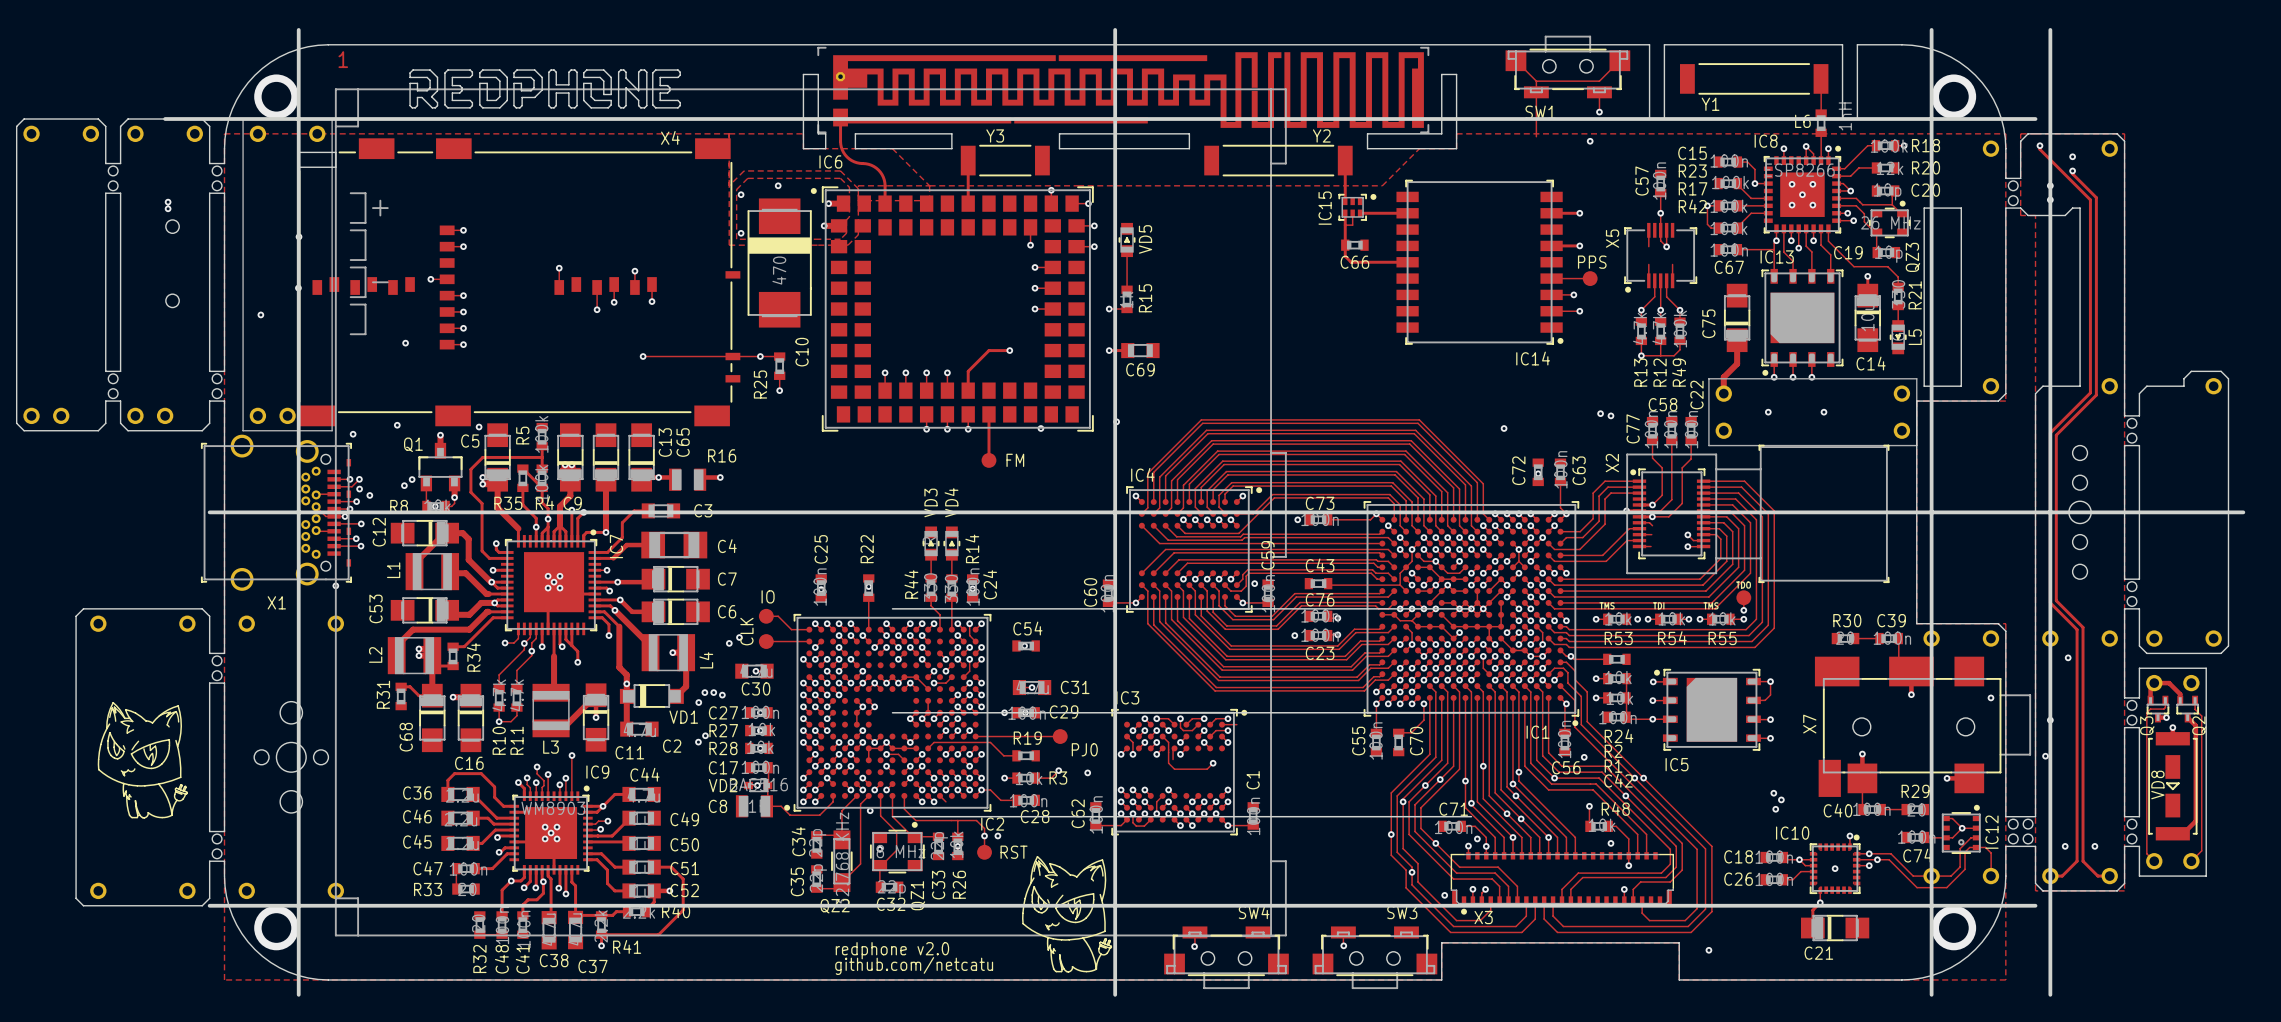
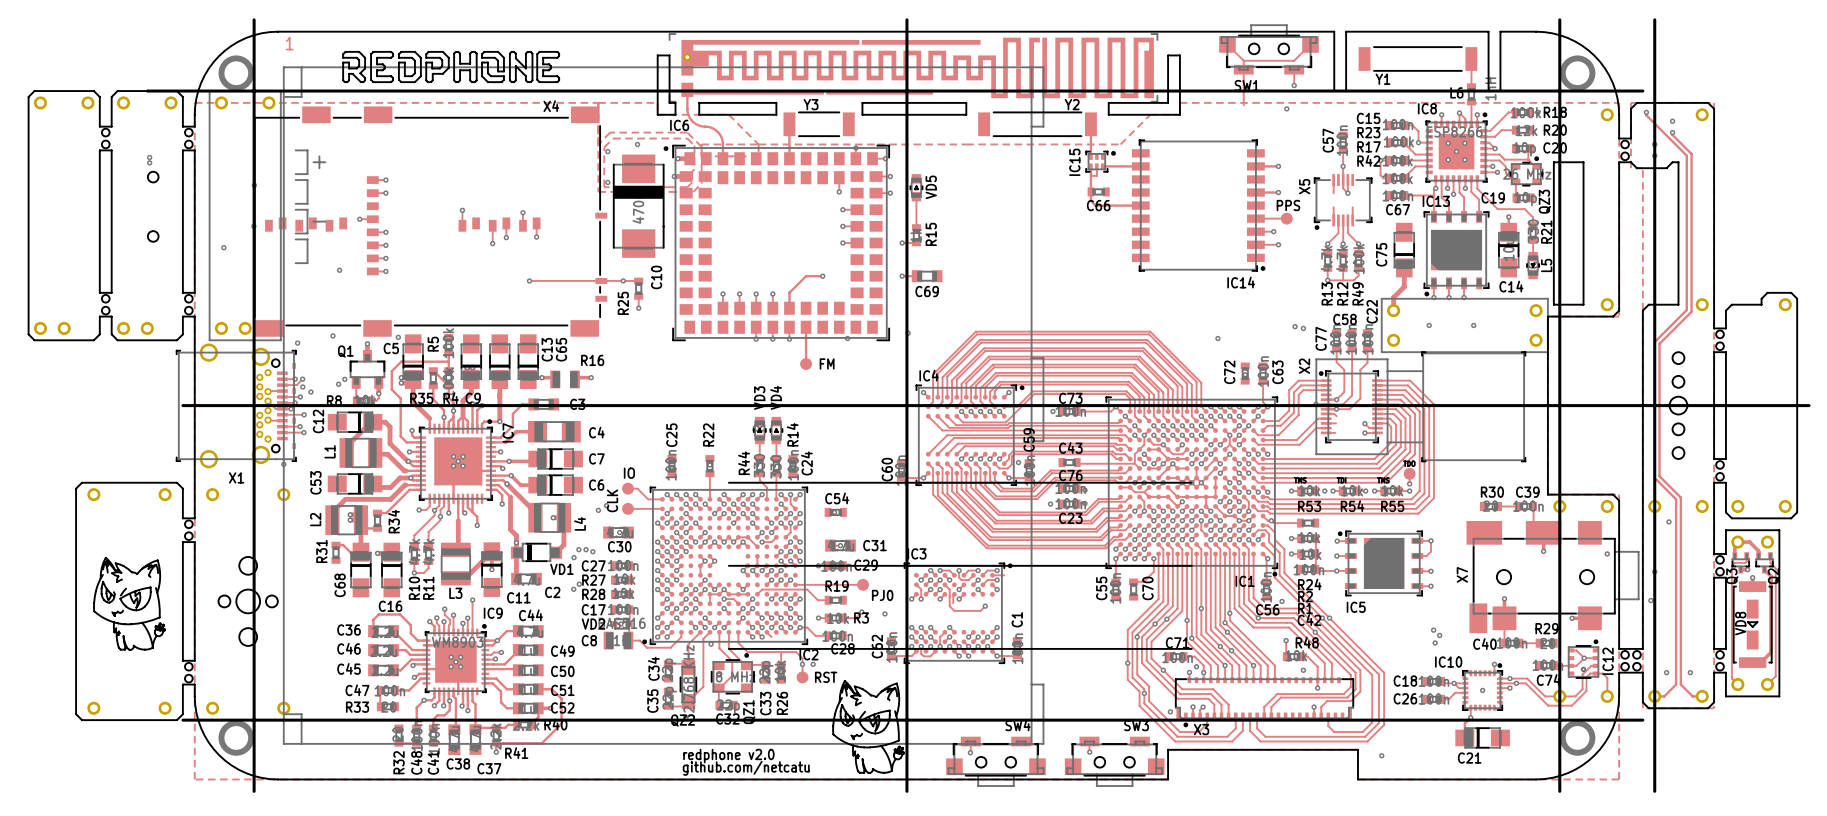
X4 footprint: [298, 138, 741, 427] -> [253, 106, 608, 337]

